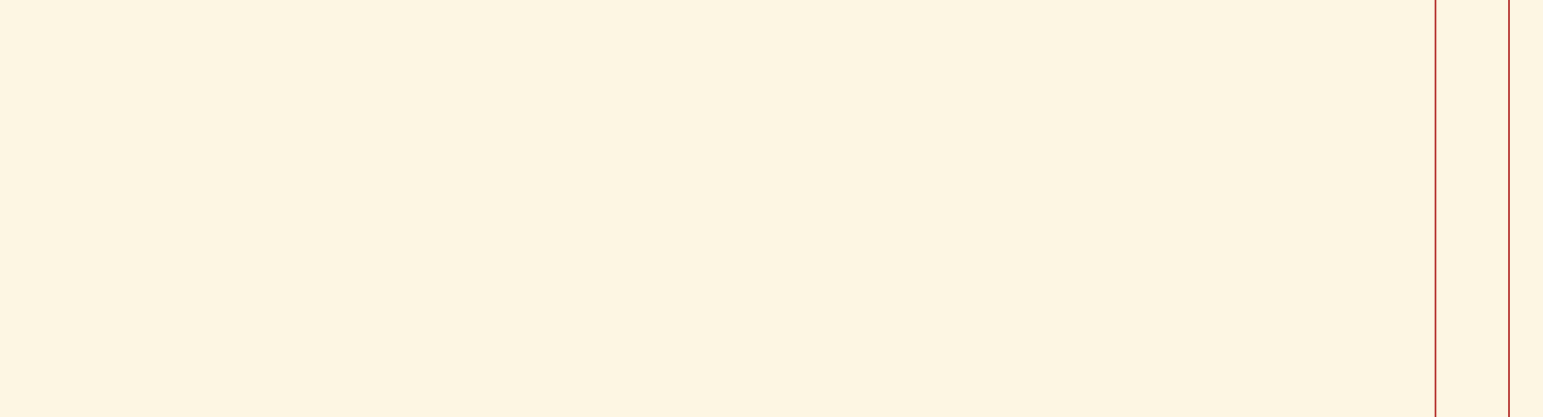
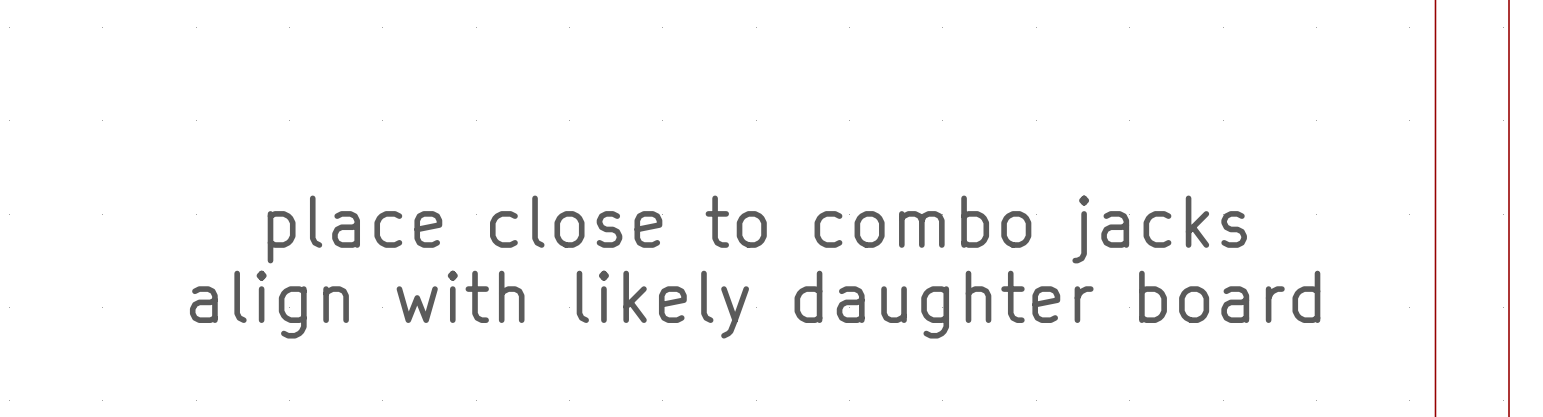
text: none -> place close to combo jacks (757, 229)
text: none -> align with likely daughter board (755, 304)

